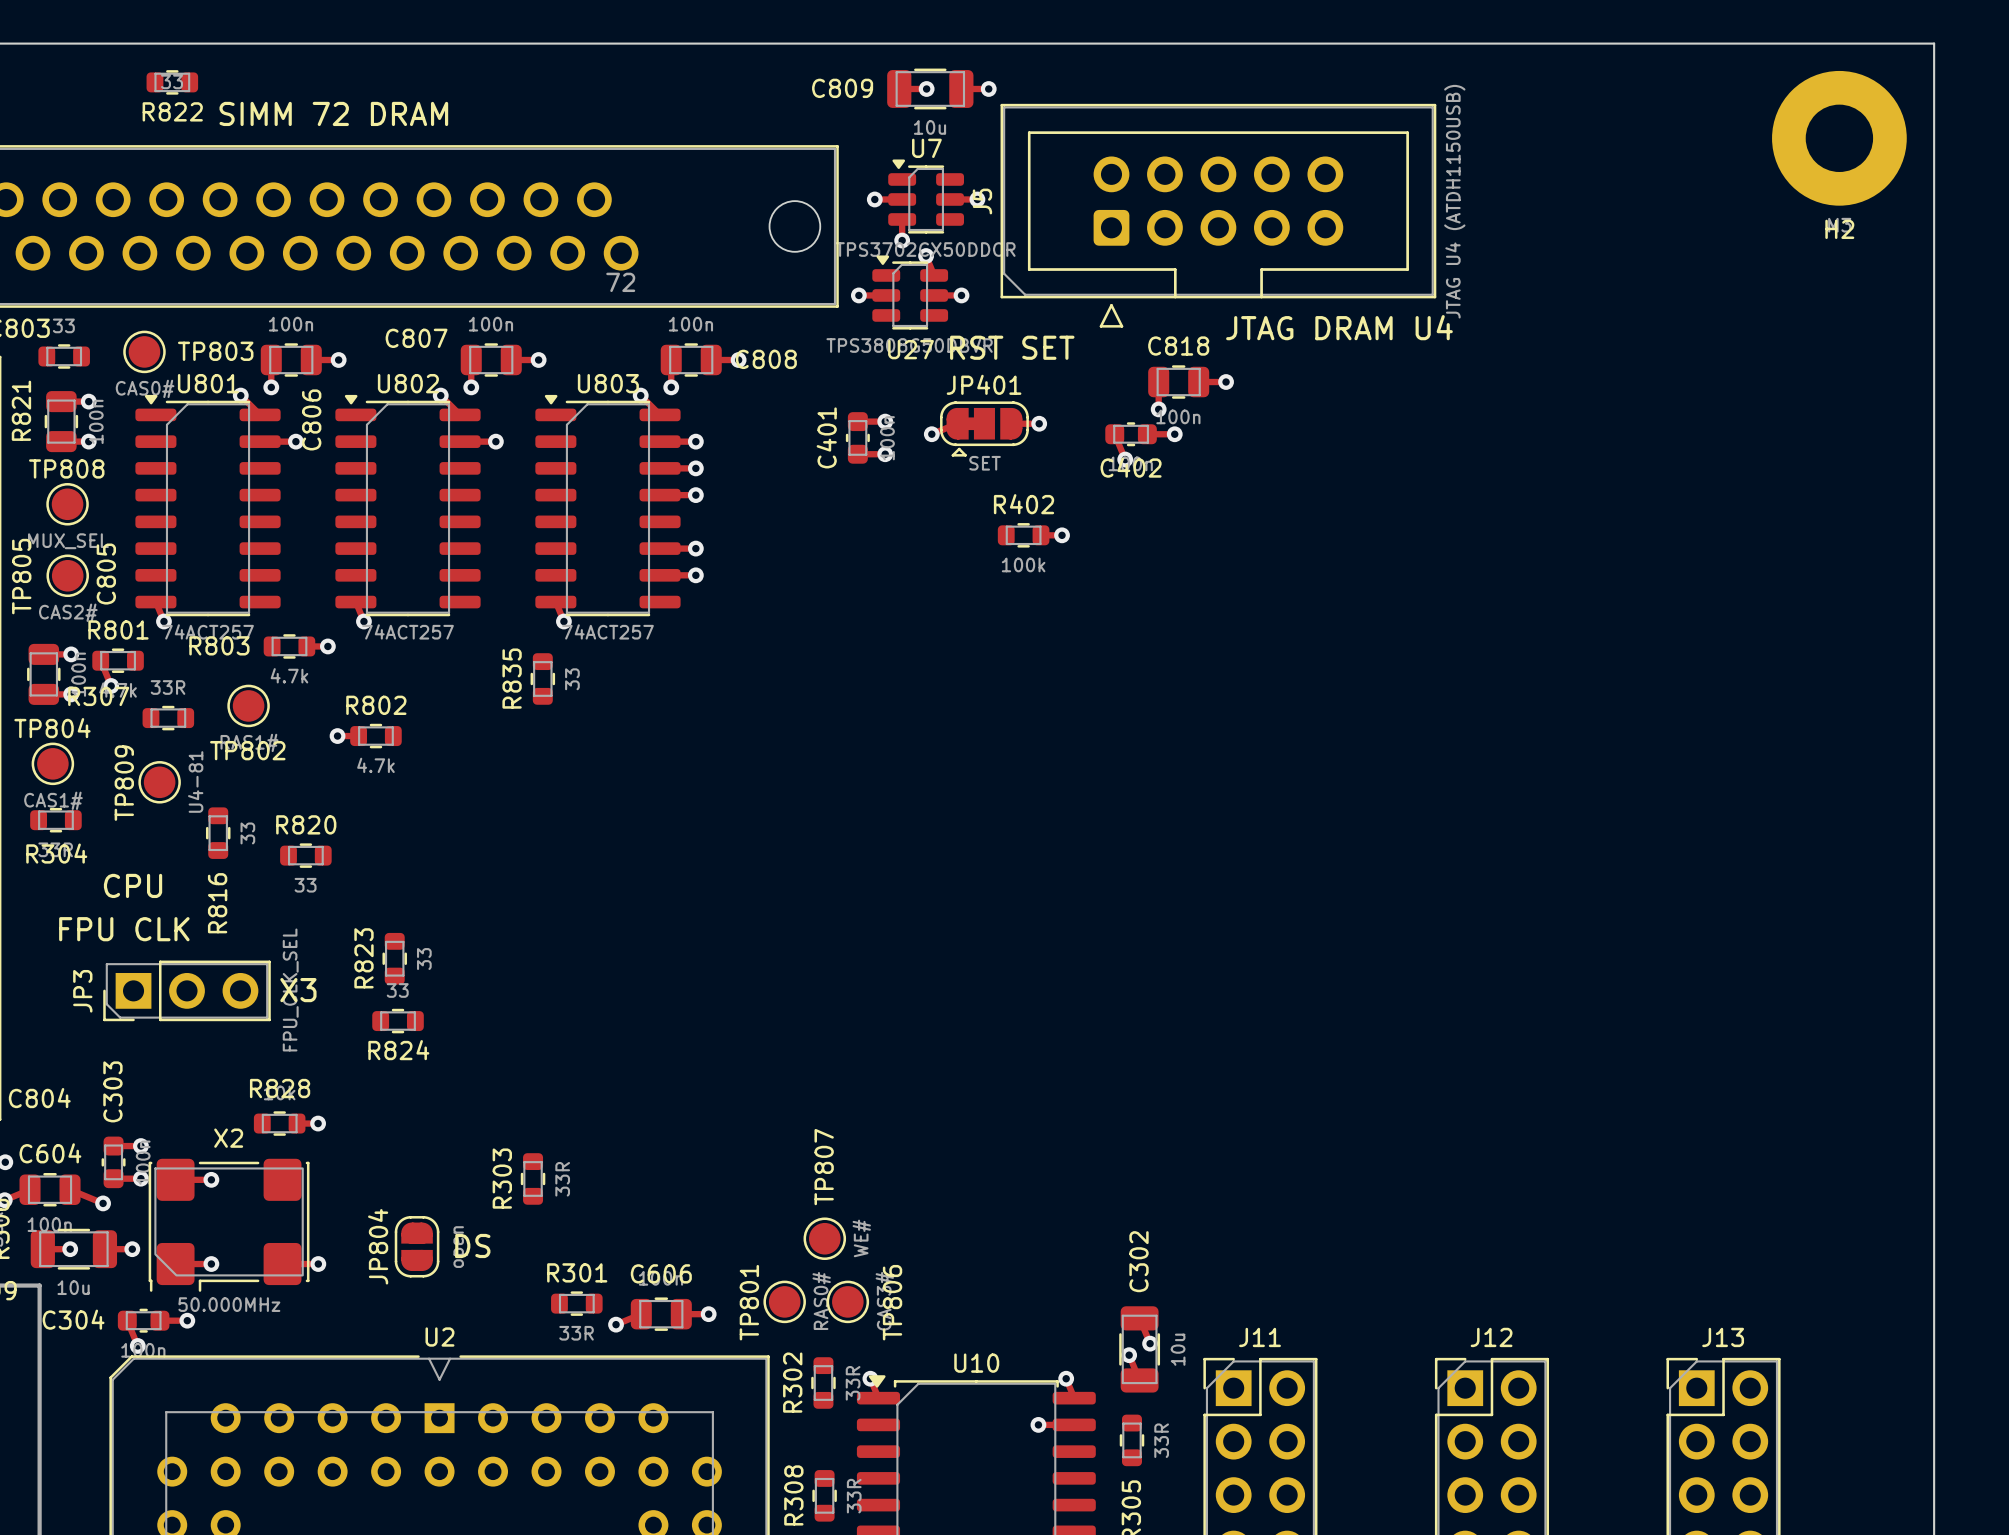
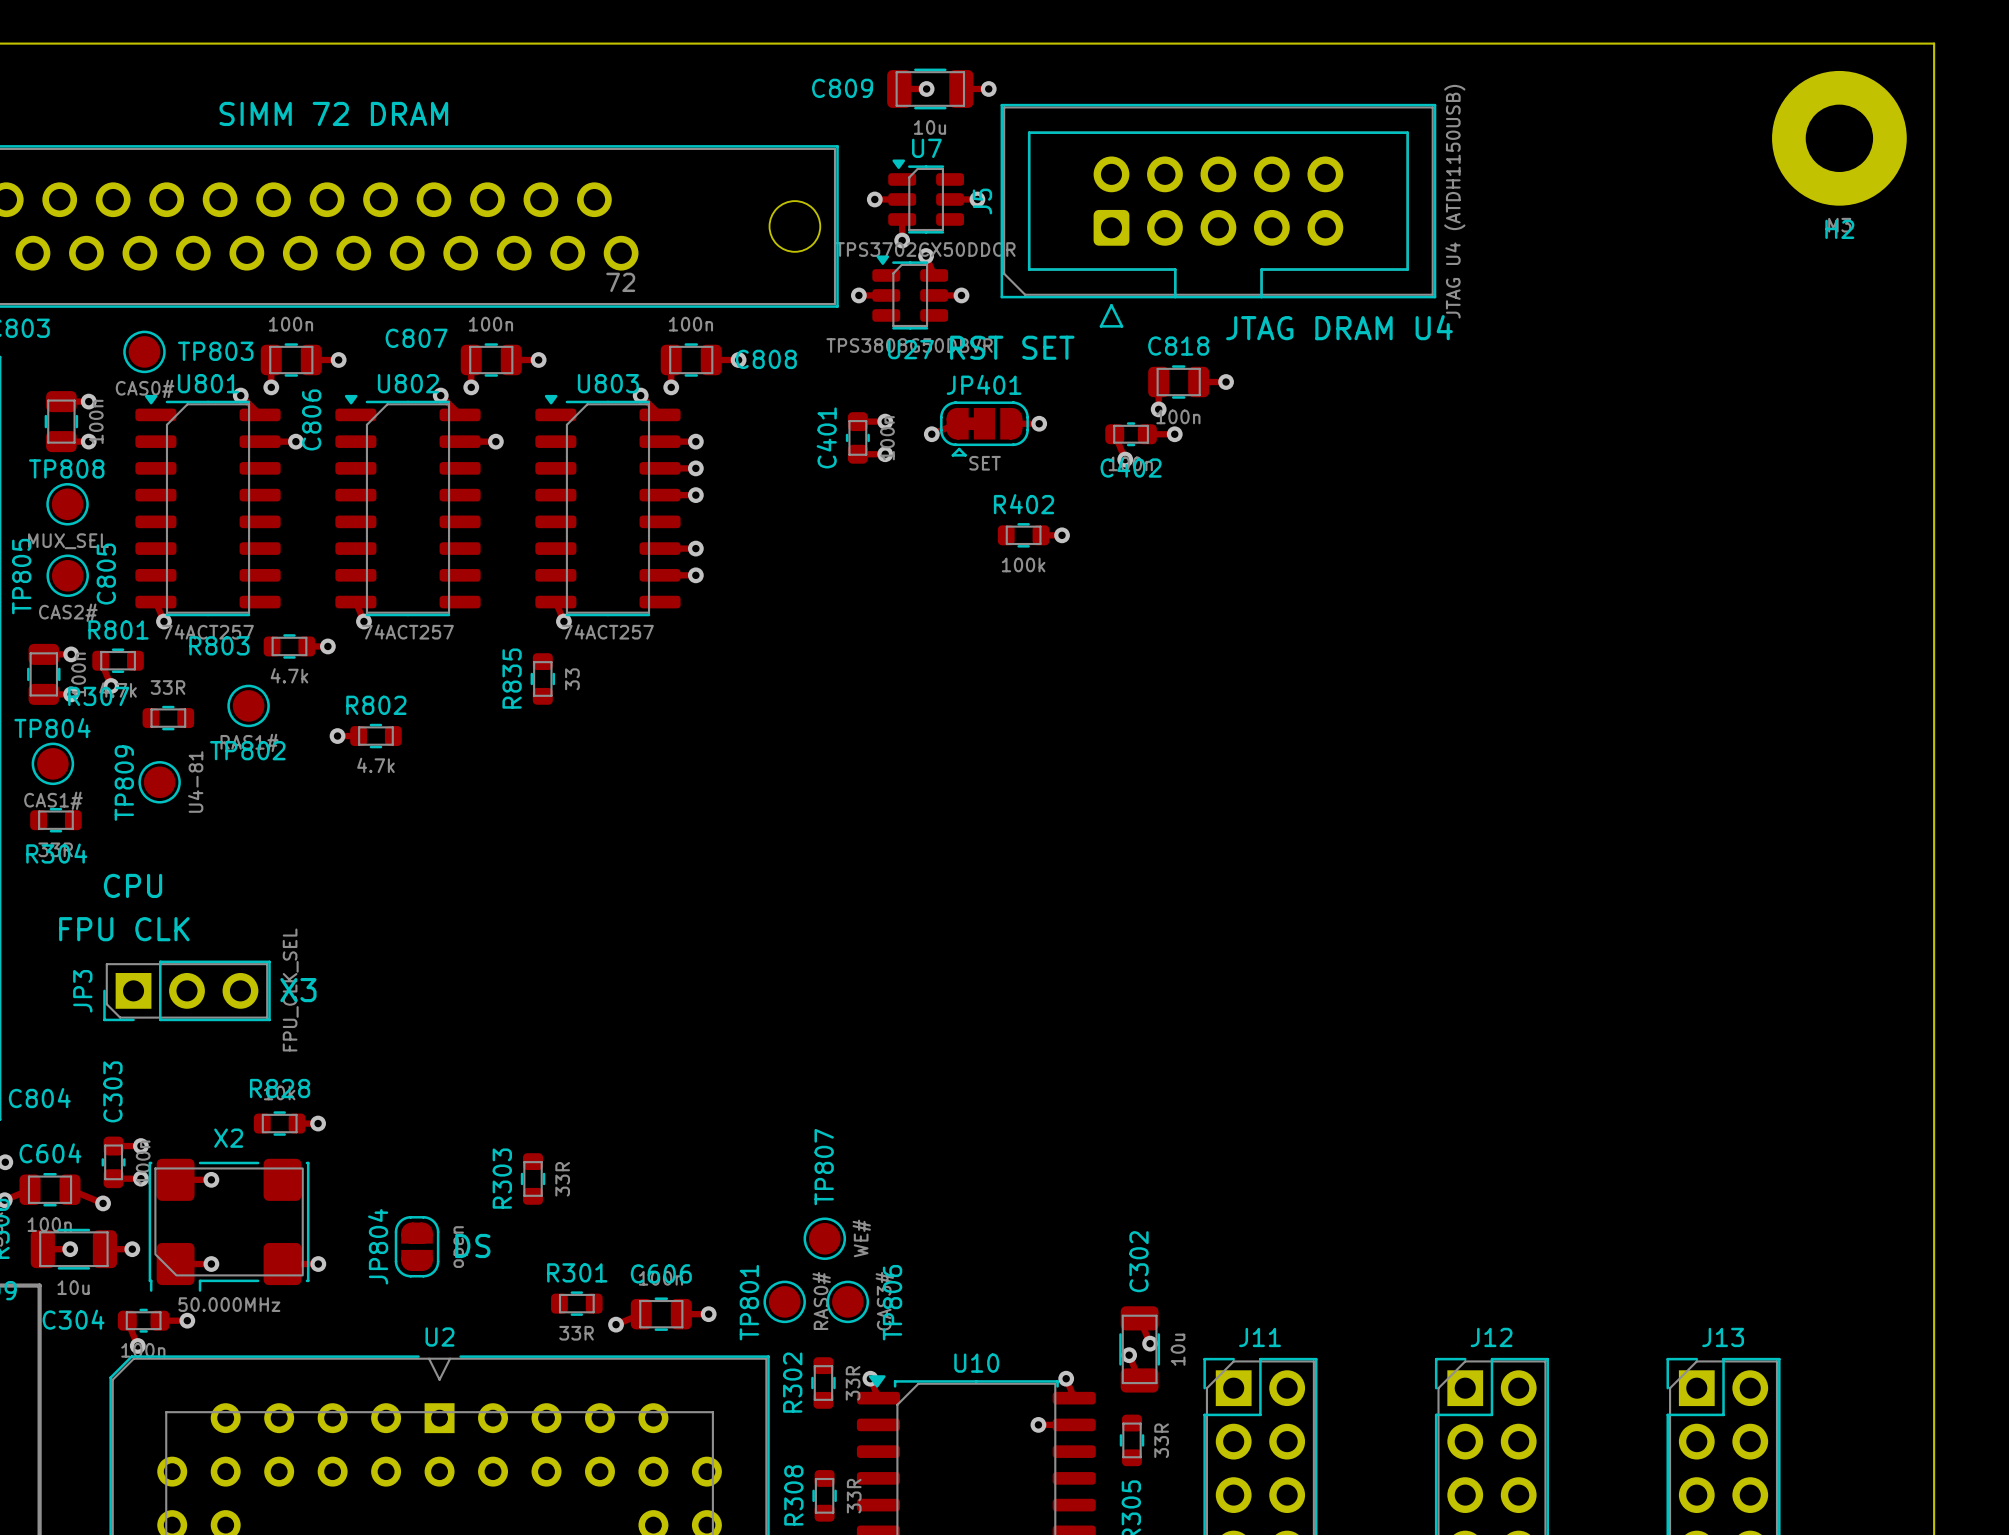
R822: 33 (172, 82) -> none
R821: 33 (64, 356) -> none
R816: 33 (218, 833) -> none
R820: 33 (305, 855) -> none
R823: 33 (394, 958) -> none
R824: 33 (398, 1021) -> none

